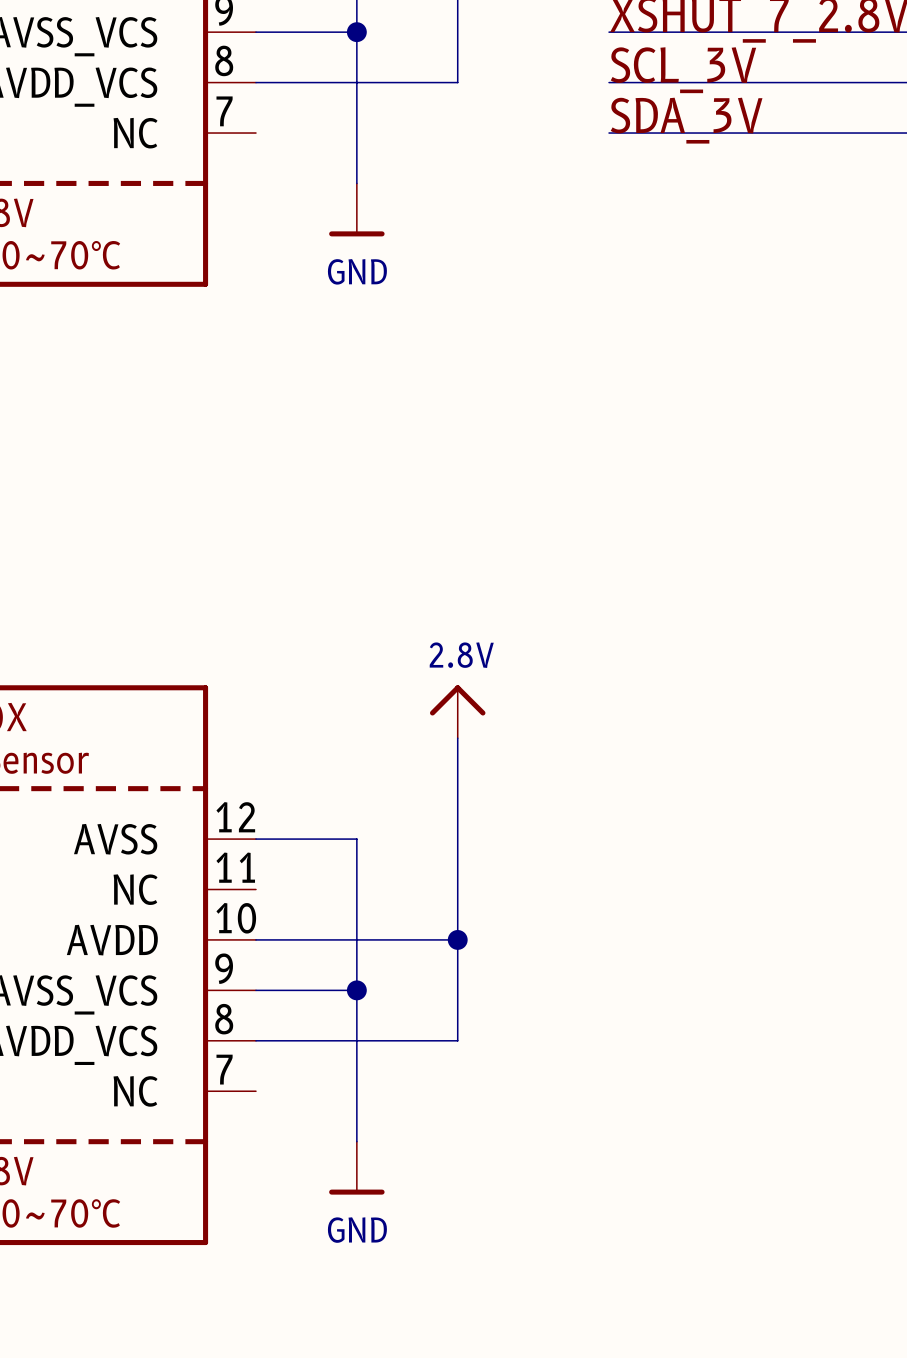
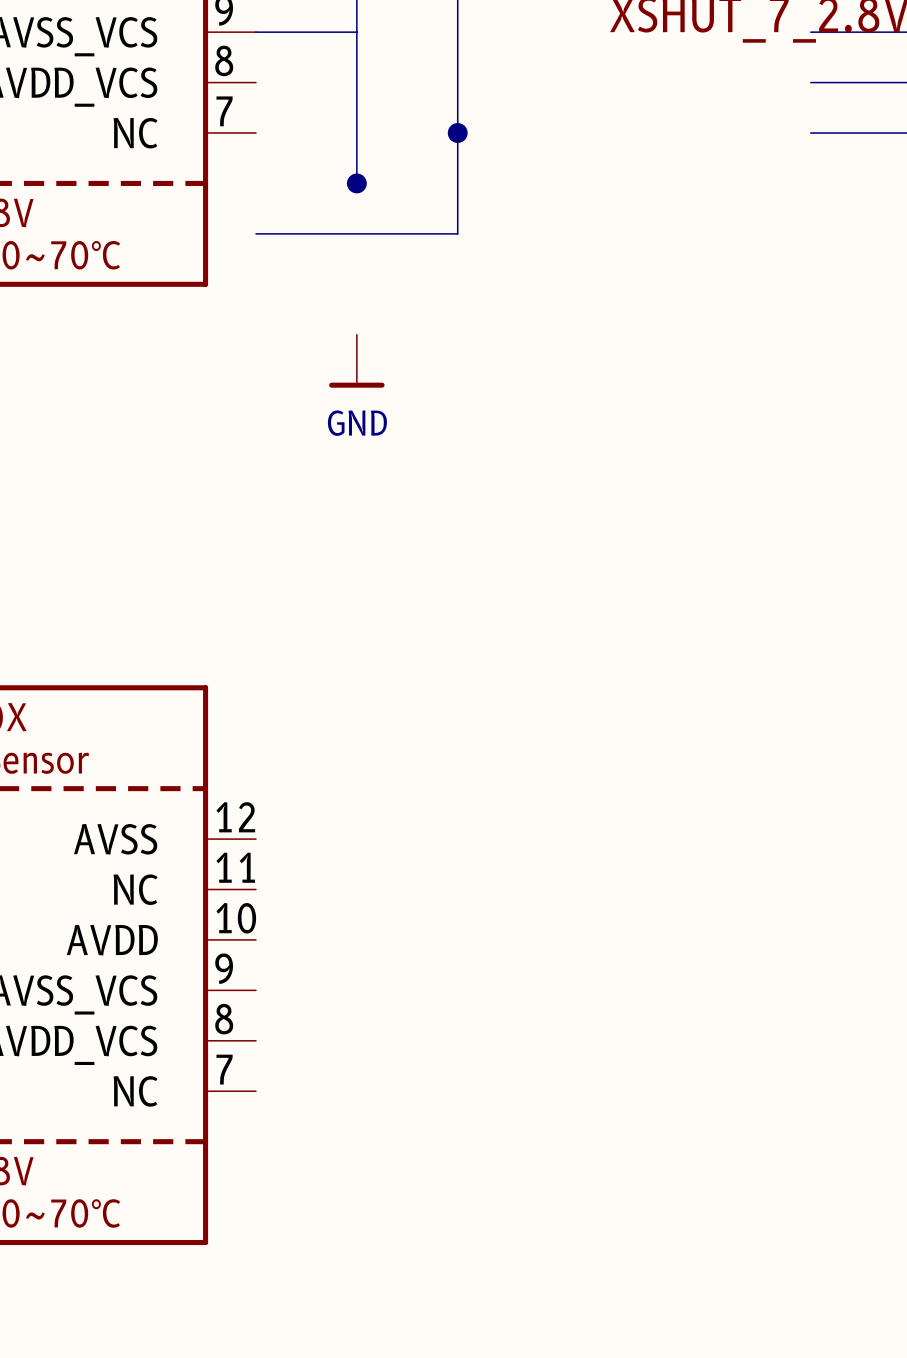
junction: (356, 32) -> none
wire: (609, 32) (810, 32) -> none
label: SCL_3V (683, 70) -> none
wire: (255, 82) (457, 82) -> (255, 233) (457, 233) (457, 82)
wire: (609, 82) (810, 82) -> none
label: SDA_3V (686, 120) -> none
junction: none -> (457, 133)
wire: (609, 133) (810, 133) -> none
junction: none -> (356, 183)
power symbol position: GND (356, 209) -> GND (356, 361)
power symbol: 2.8V (457, 711) -> none
wire: (457, 738) (457, 1040) (255, 1040) -> none
wire: (255, 839) (356, 839) (356, 1141) -> none
wire: (255, 939) (457, 939) -> none
junction: (457, 939) -> none
wire: (255, 990) (356, 990) -> none
junction: (356, 990) -> none
power symbol: GND (356, 1168) -> none

